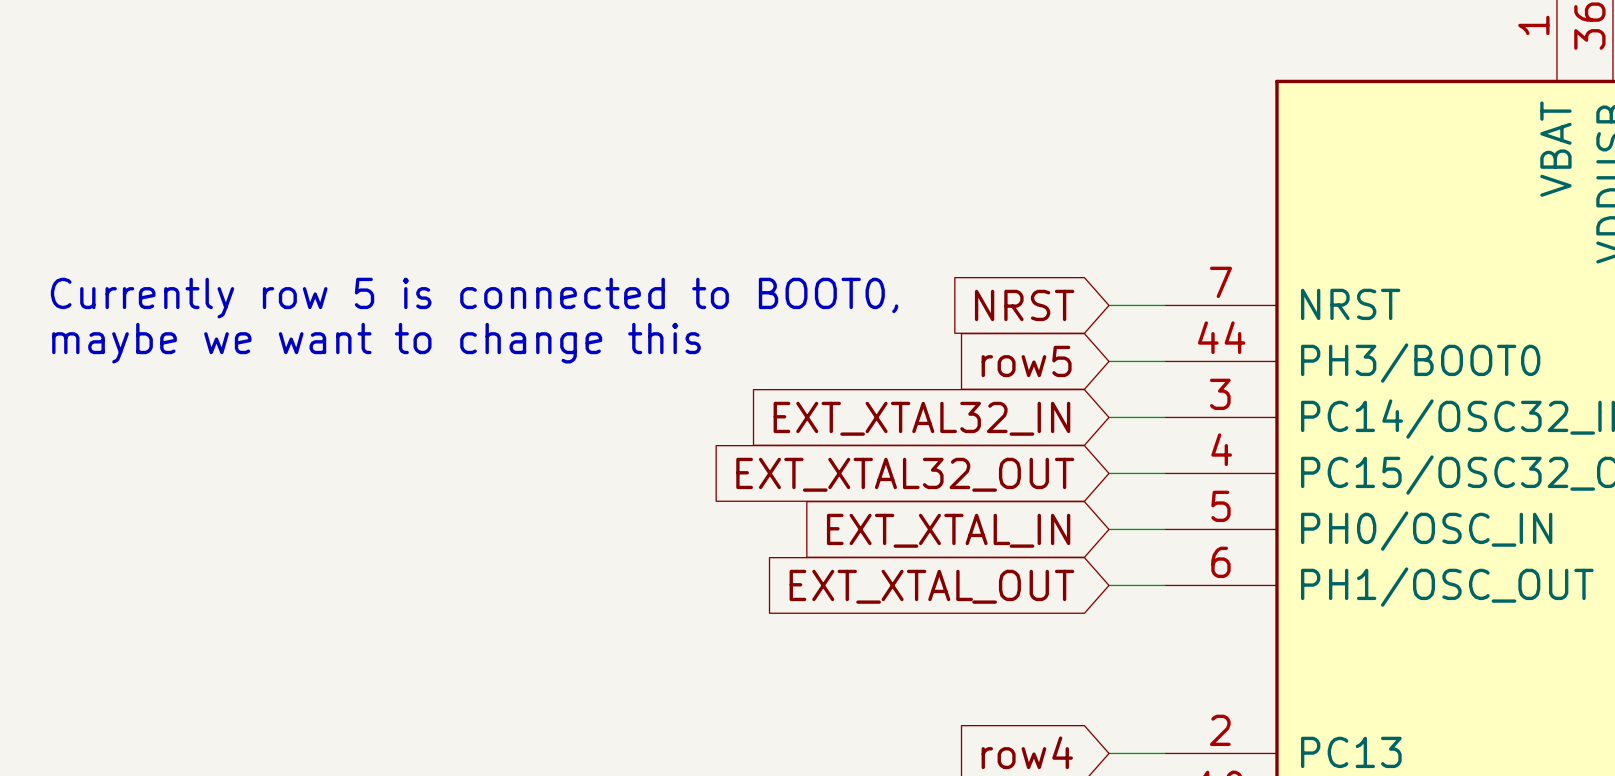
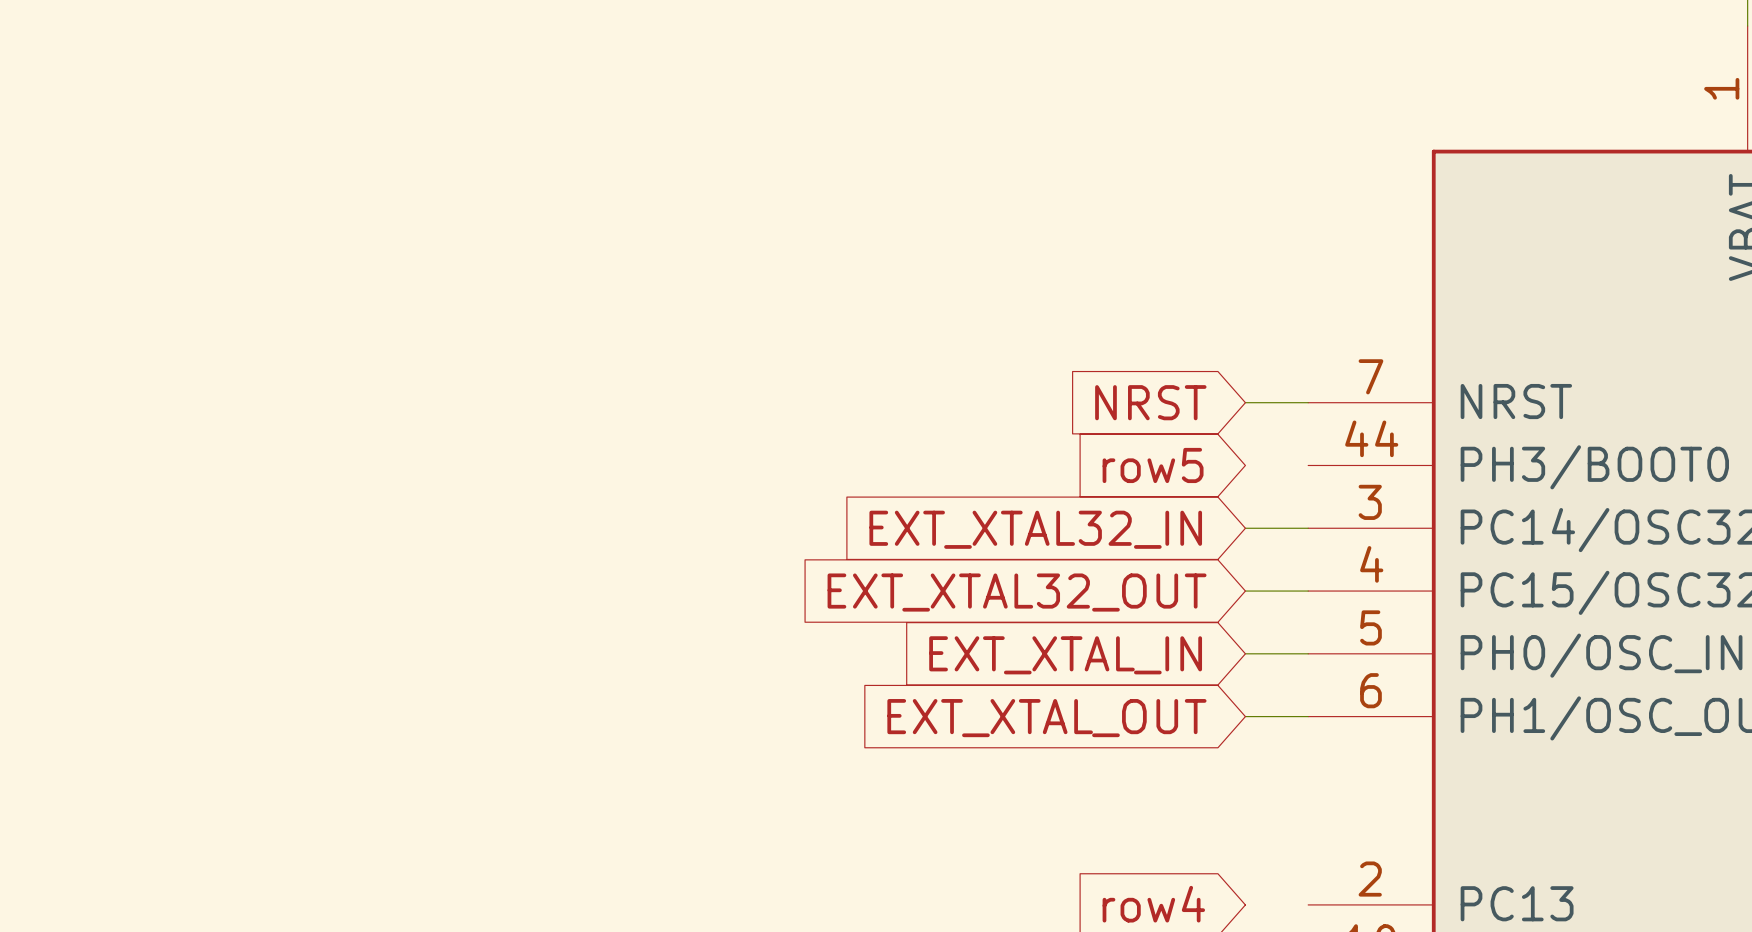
text: Currently row 5 is connected to BOOT0, (474, 298) -> none
text: maybe we want to change this (376, 343) -> none
wire: (1108, 361) (1164, 361) -> none
wire: (1108, 753) (1164, 753) -> none

